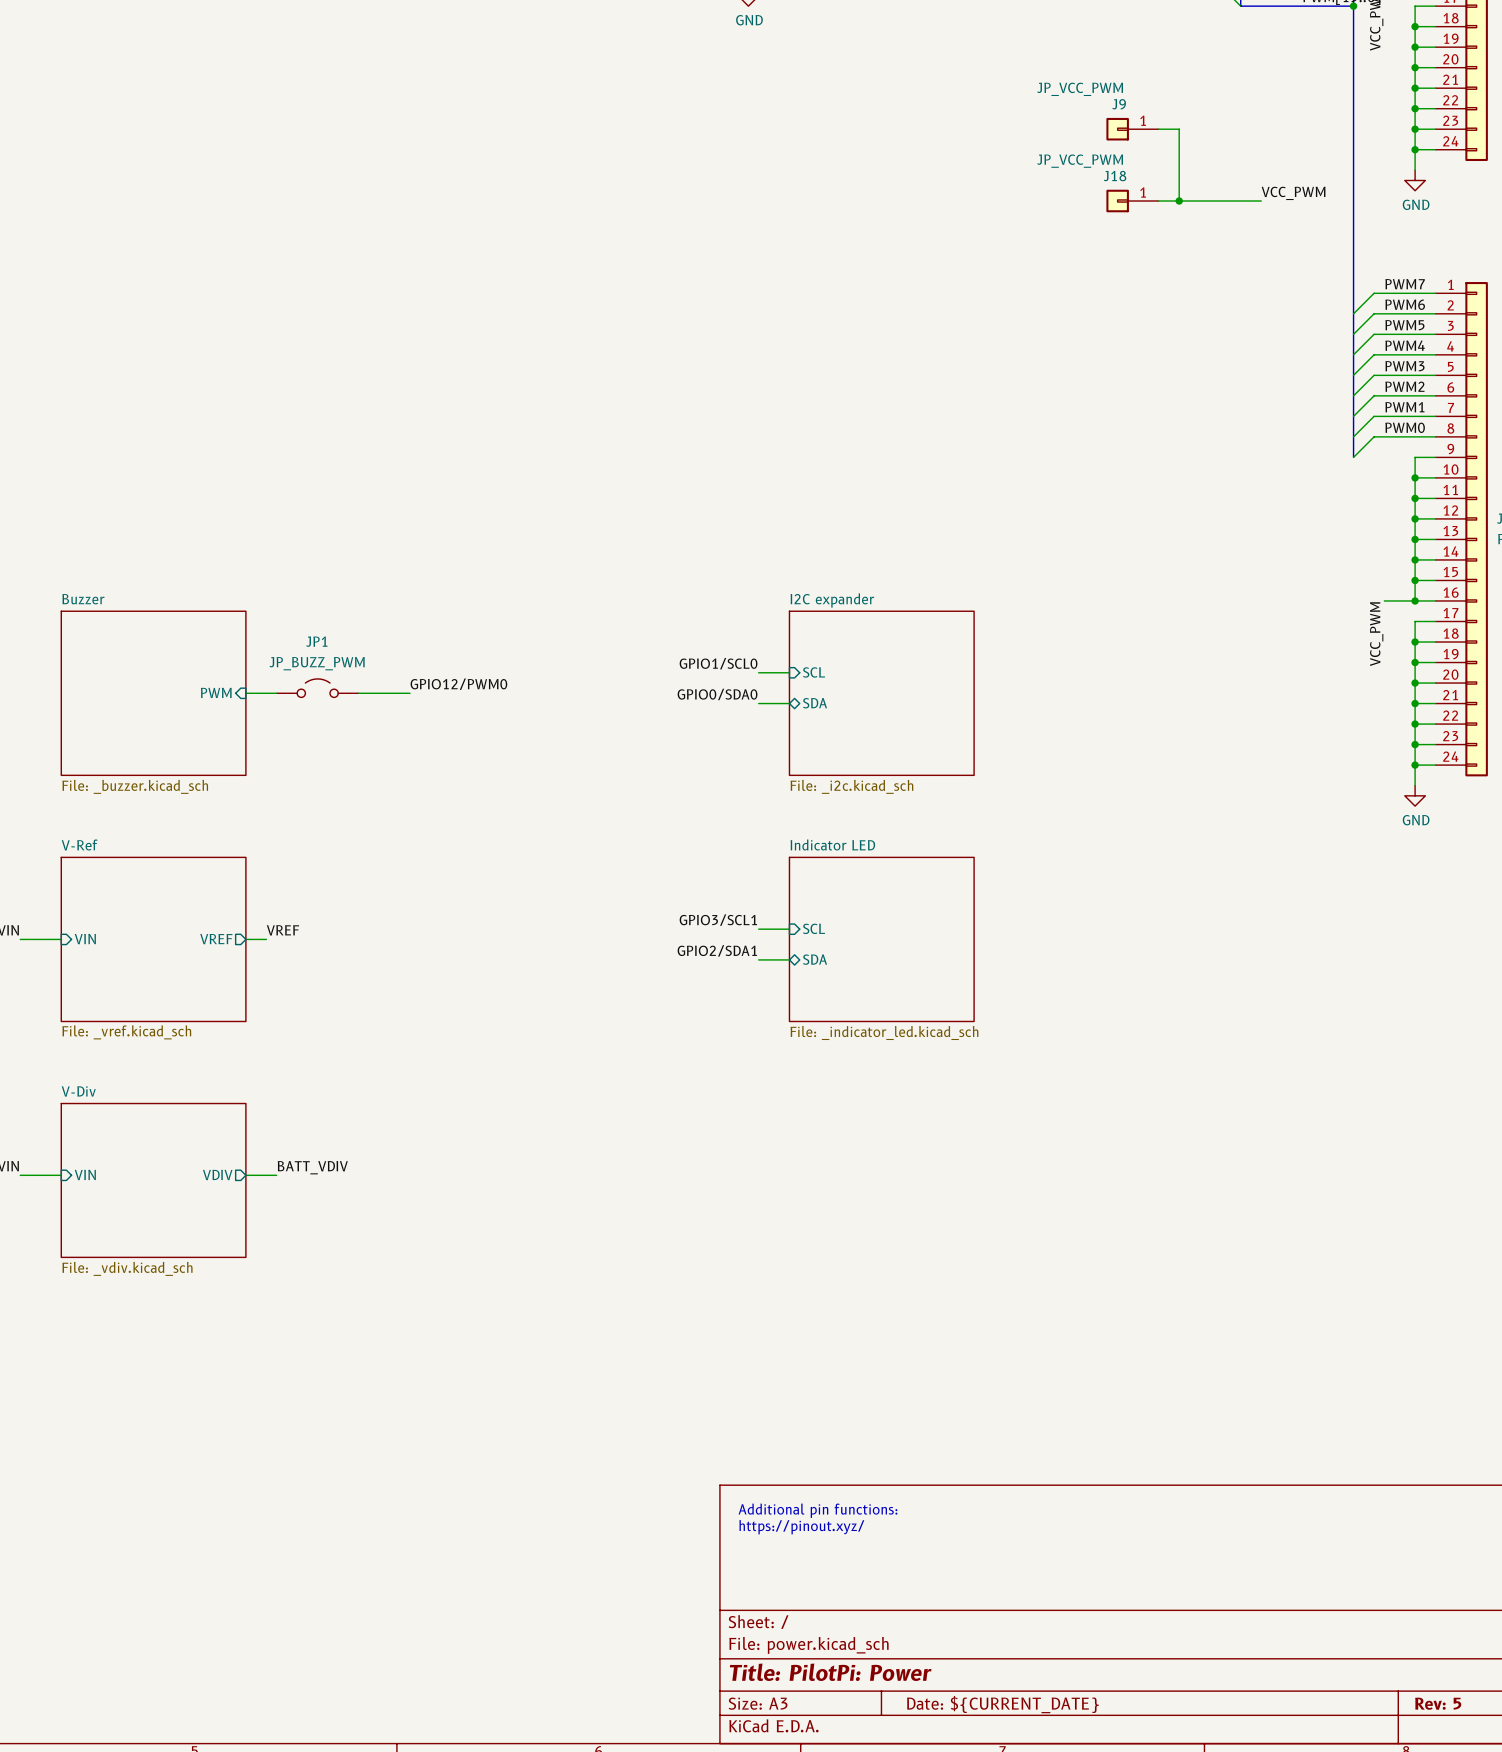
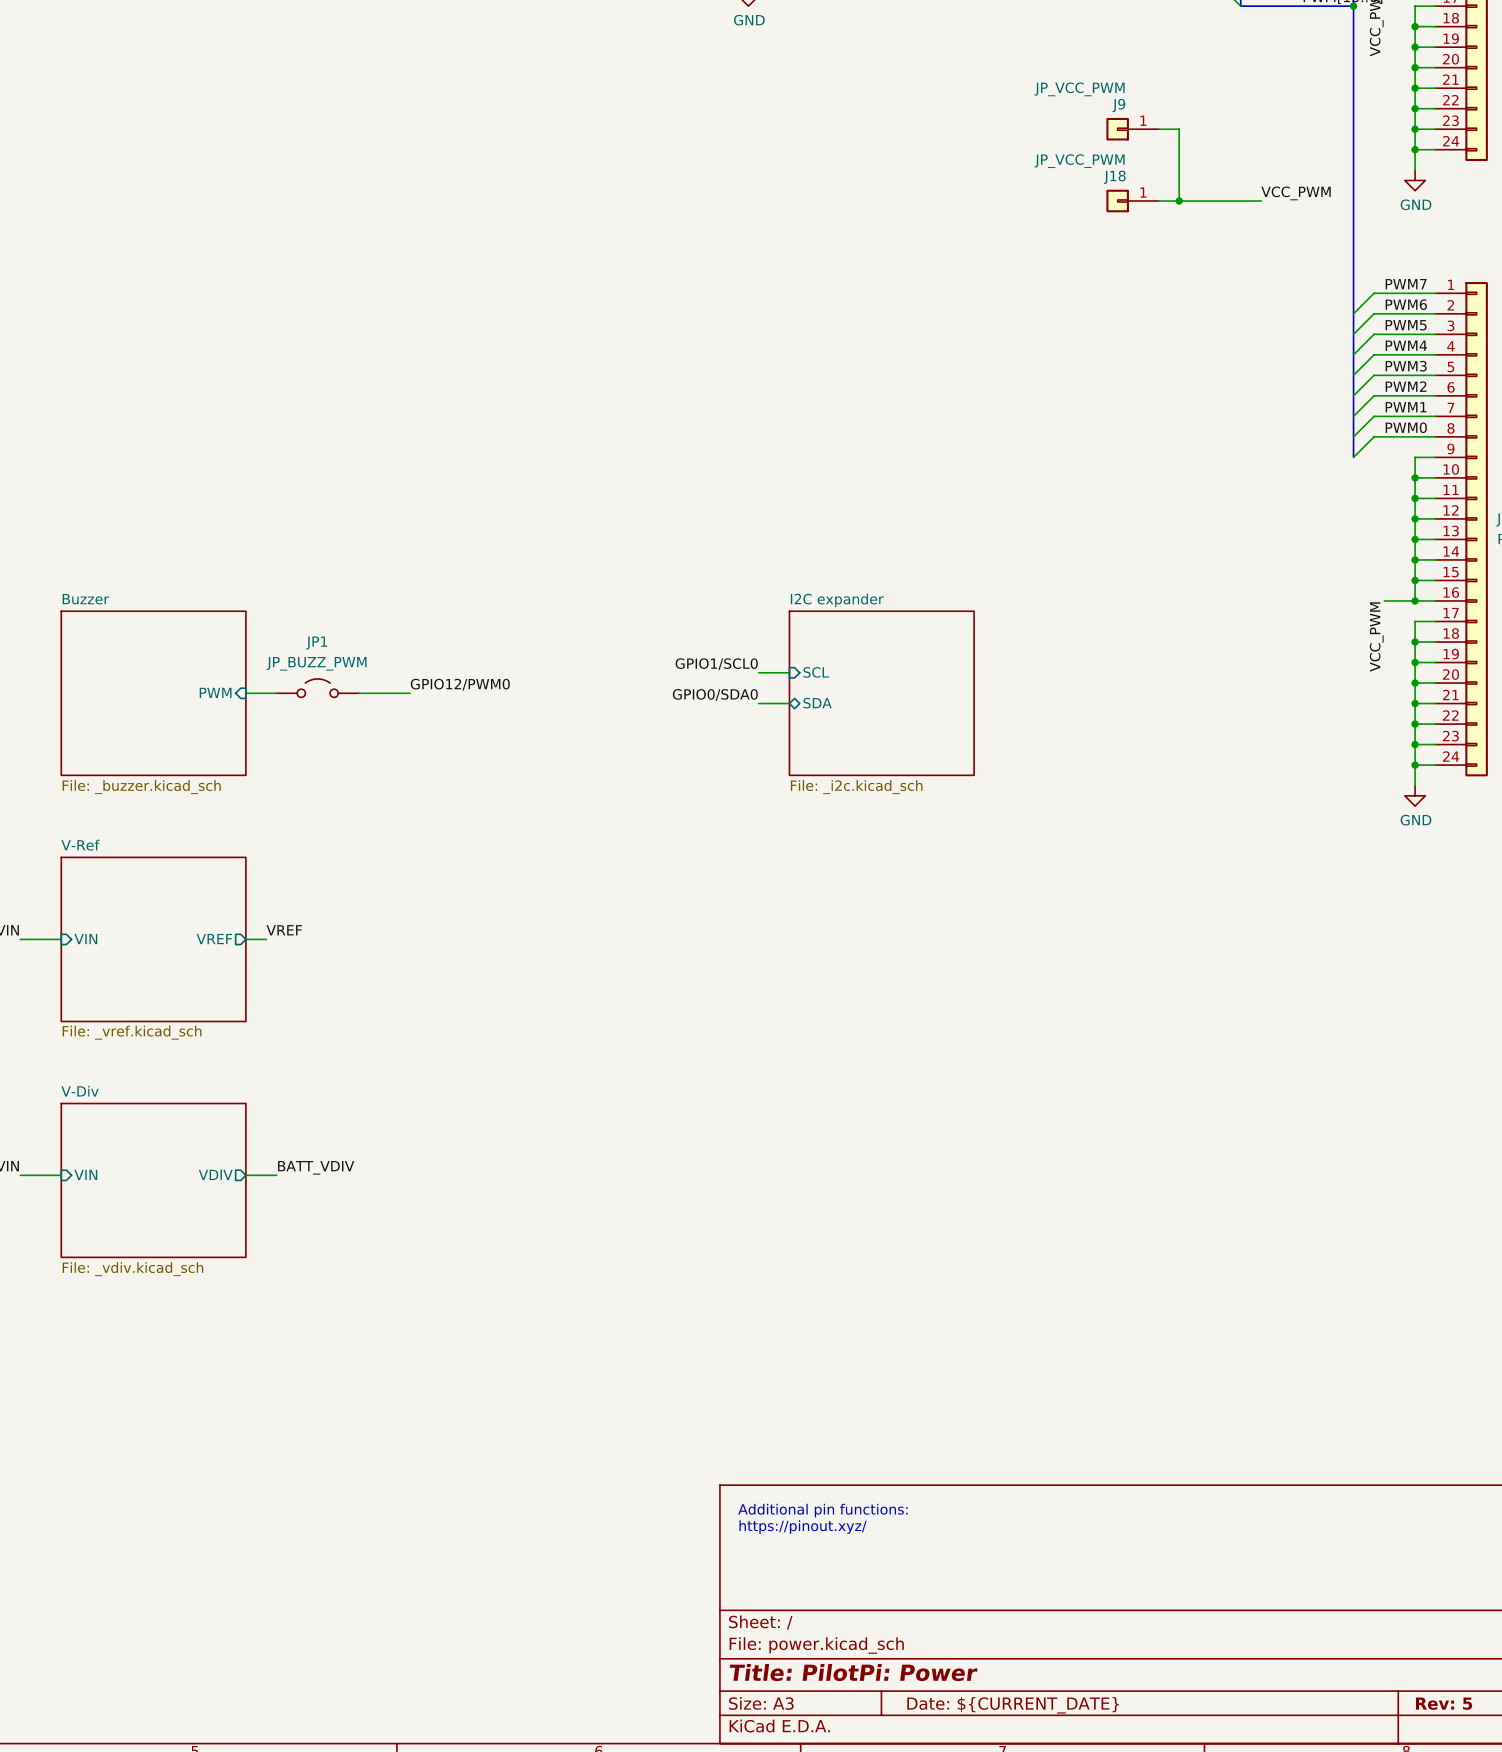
label: GPIO3/SCL1 (718, 920) -> none
sheet pin: SCL (814, 928) -> none
wire: (758, 929) (789, 929) -> none
sheet Indicator LED: File: _indicator_led.kicad_sch (881, 939) -> none
label: GPIO2/SDA1 (717, 950) -> none
wire: (758, 959) (789, 959) -> none
sheet pin: SDA (815, 959) -> none

